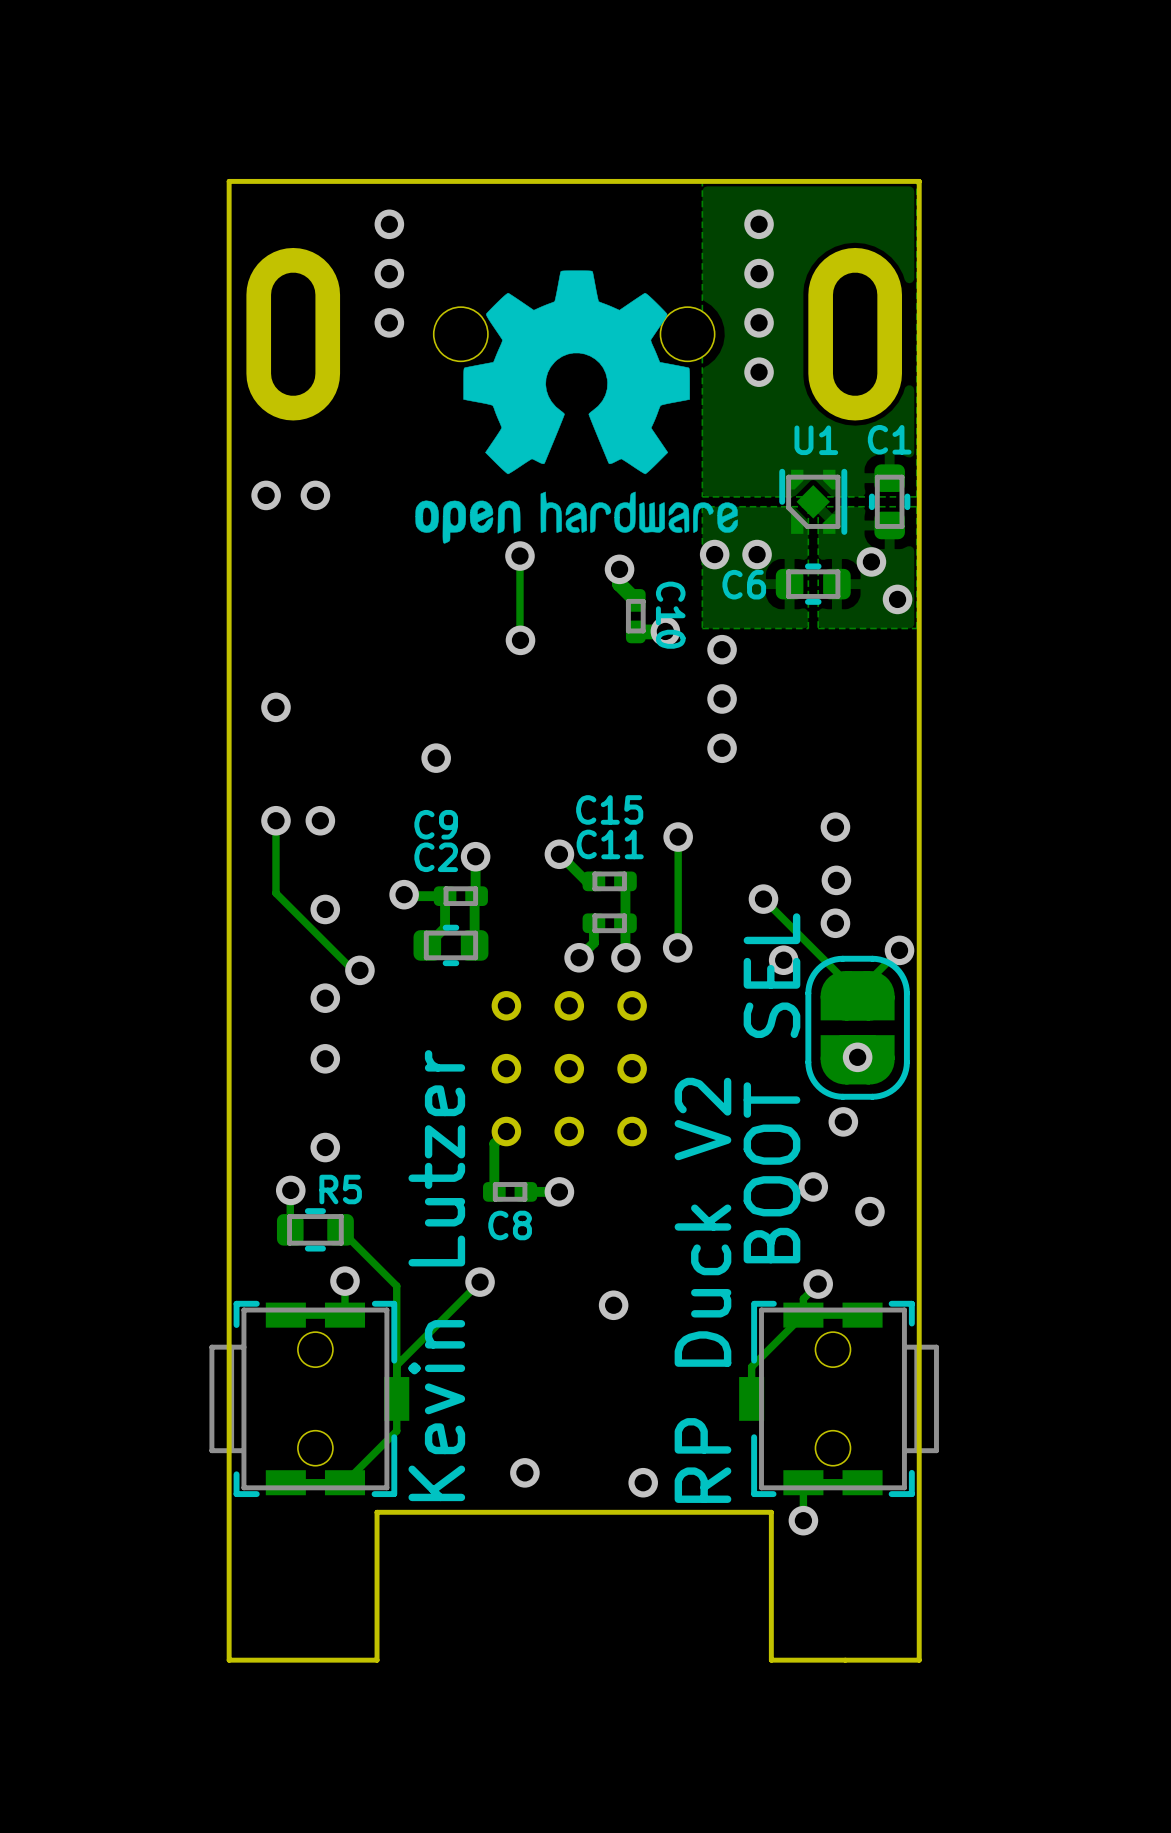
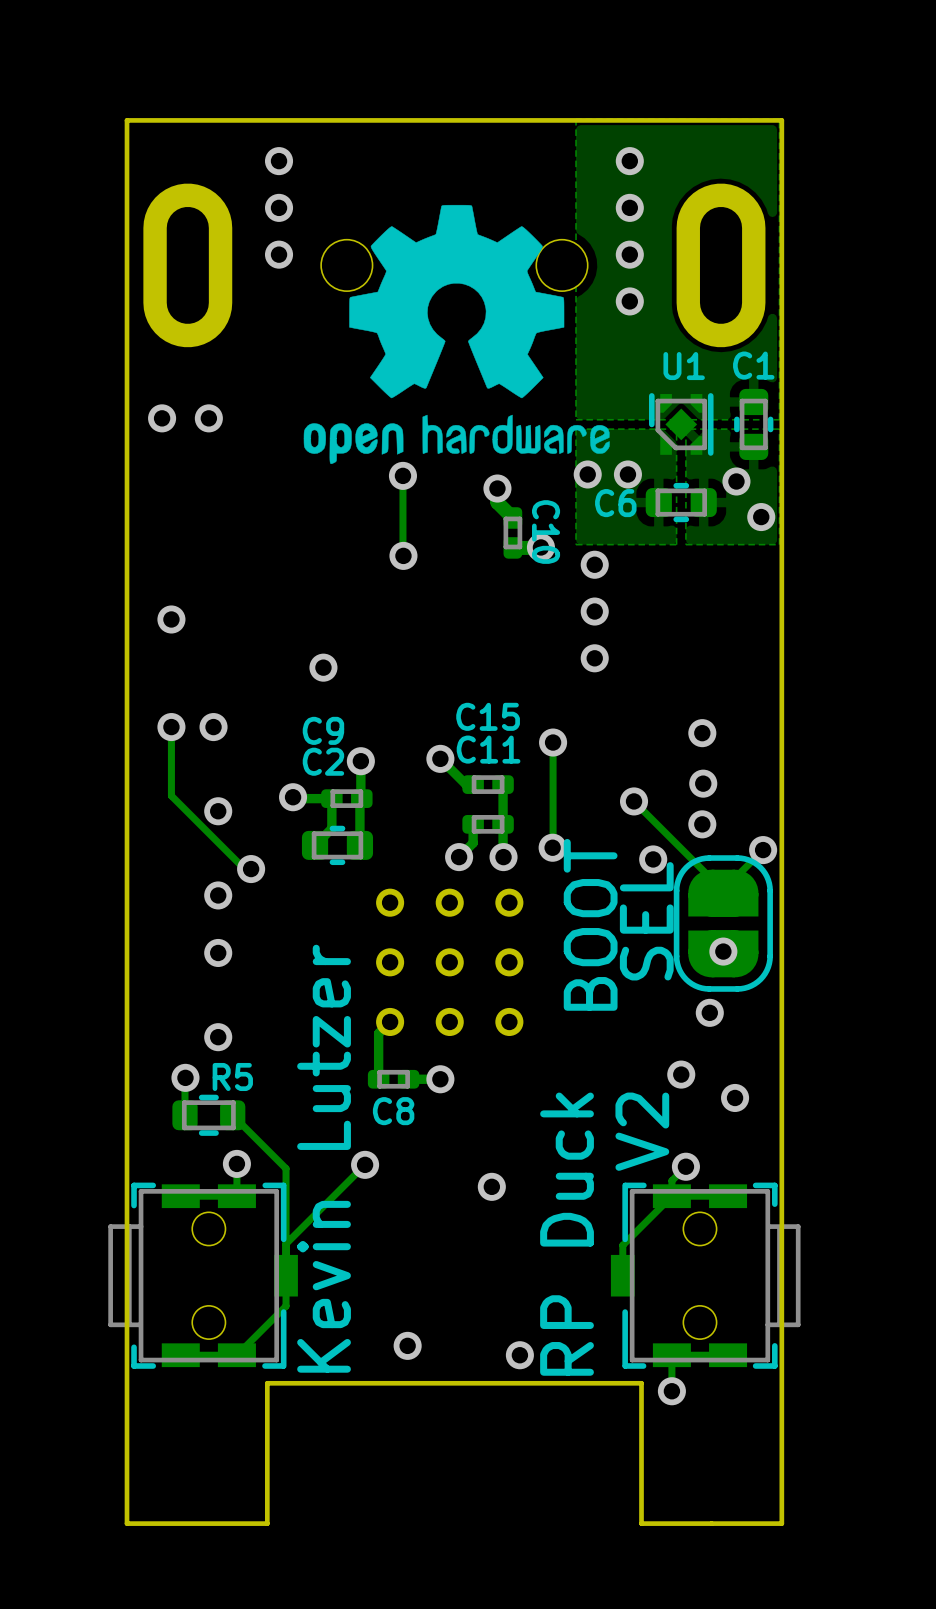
text: none -> SEL (646, 921)
text: BOOT SEL (771, 1088) -> none
text: none -> V2 (642, 1131)
text: RP Duck V2 (702, 1290) -> BOOT (590, 924)
text: none -> RP Duck (567, 1234)

